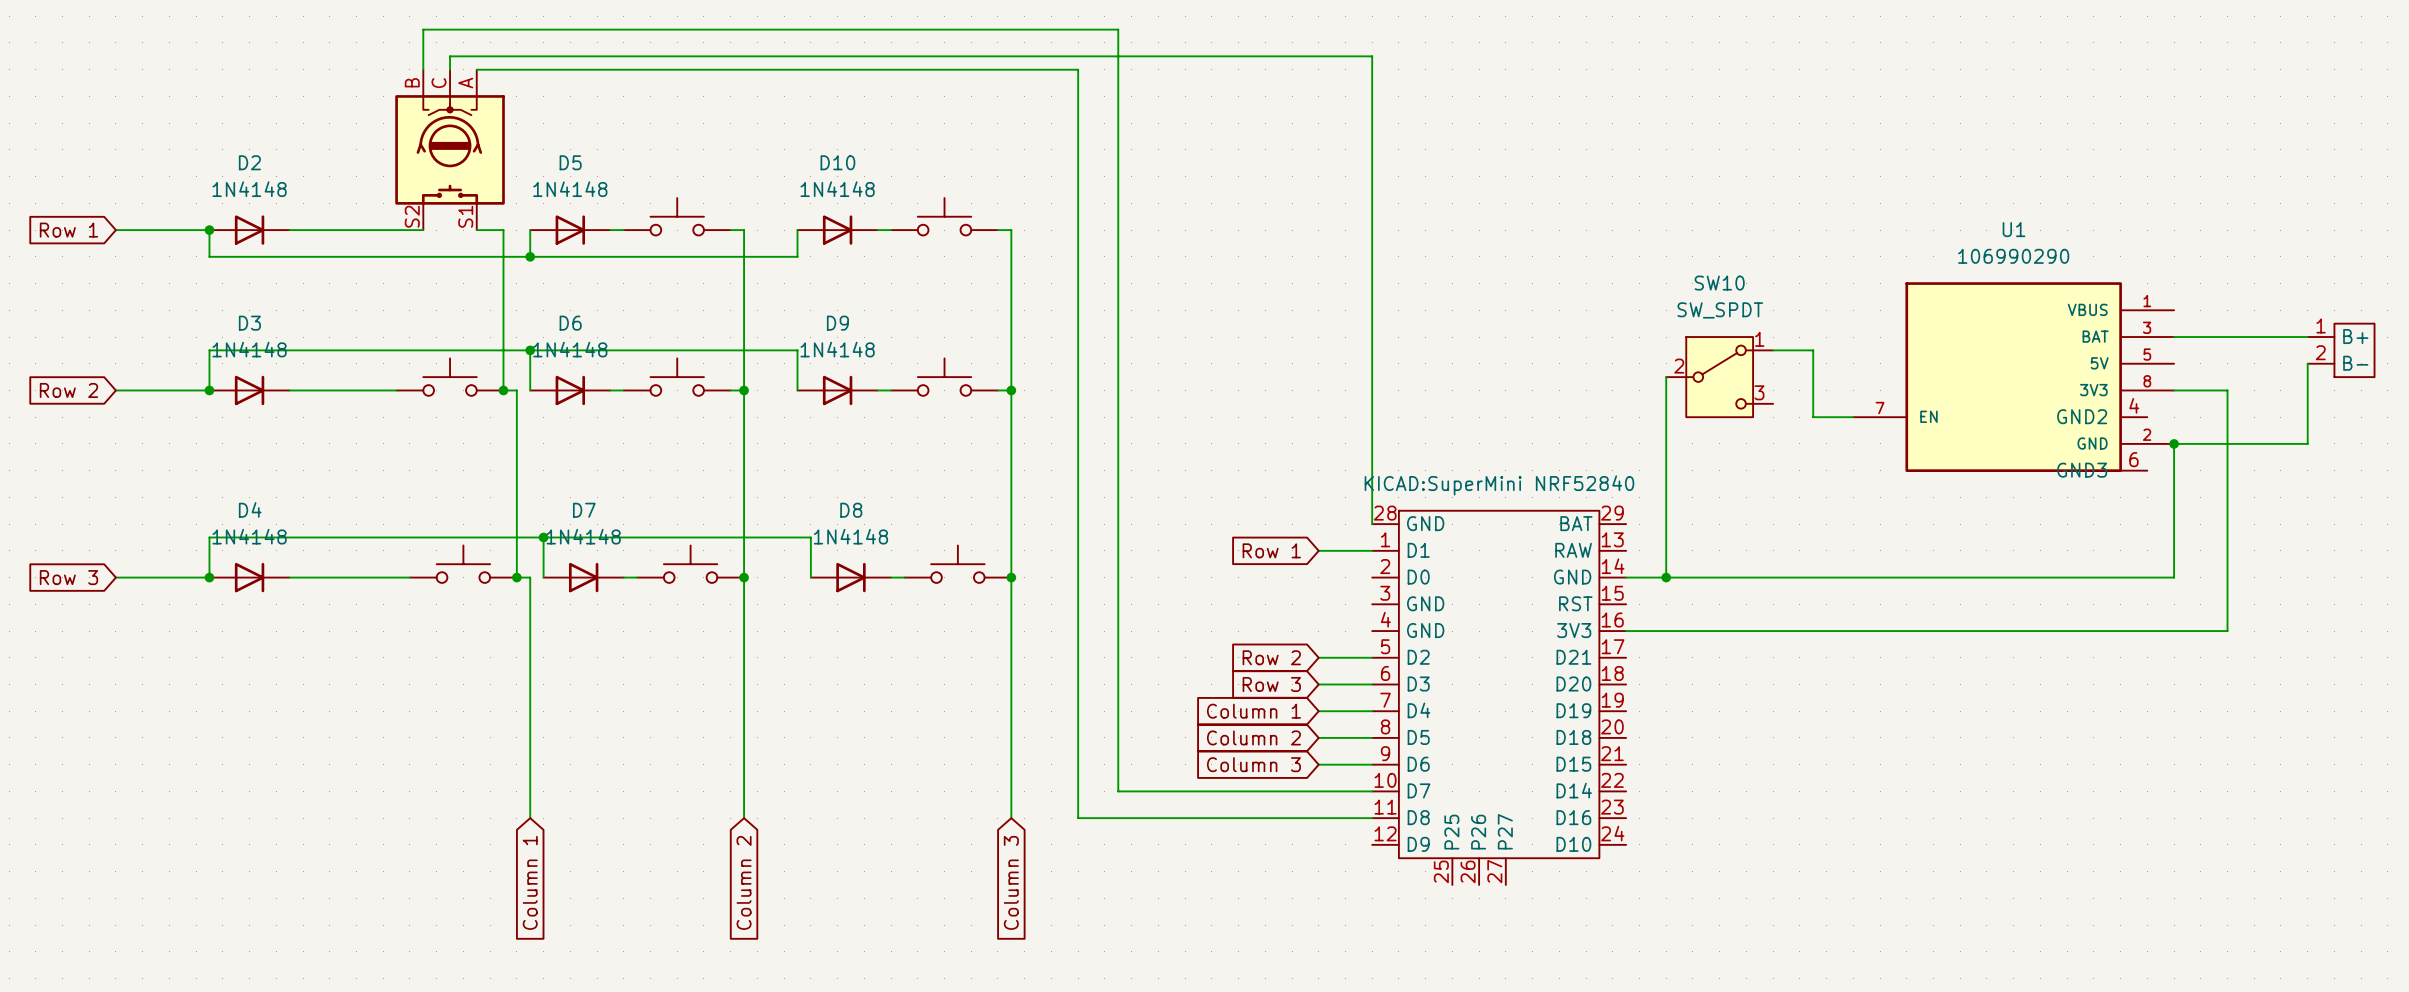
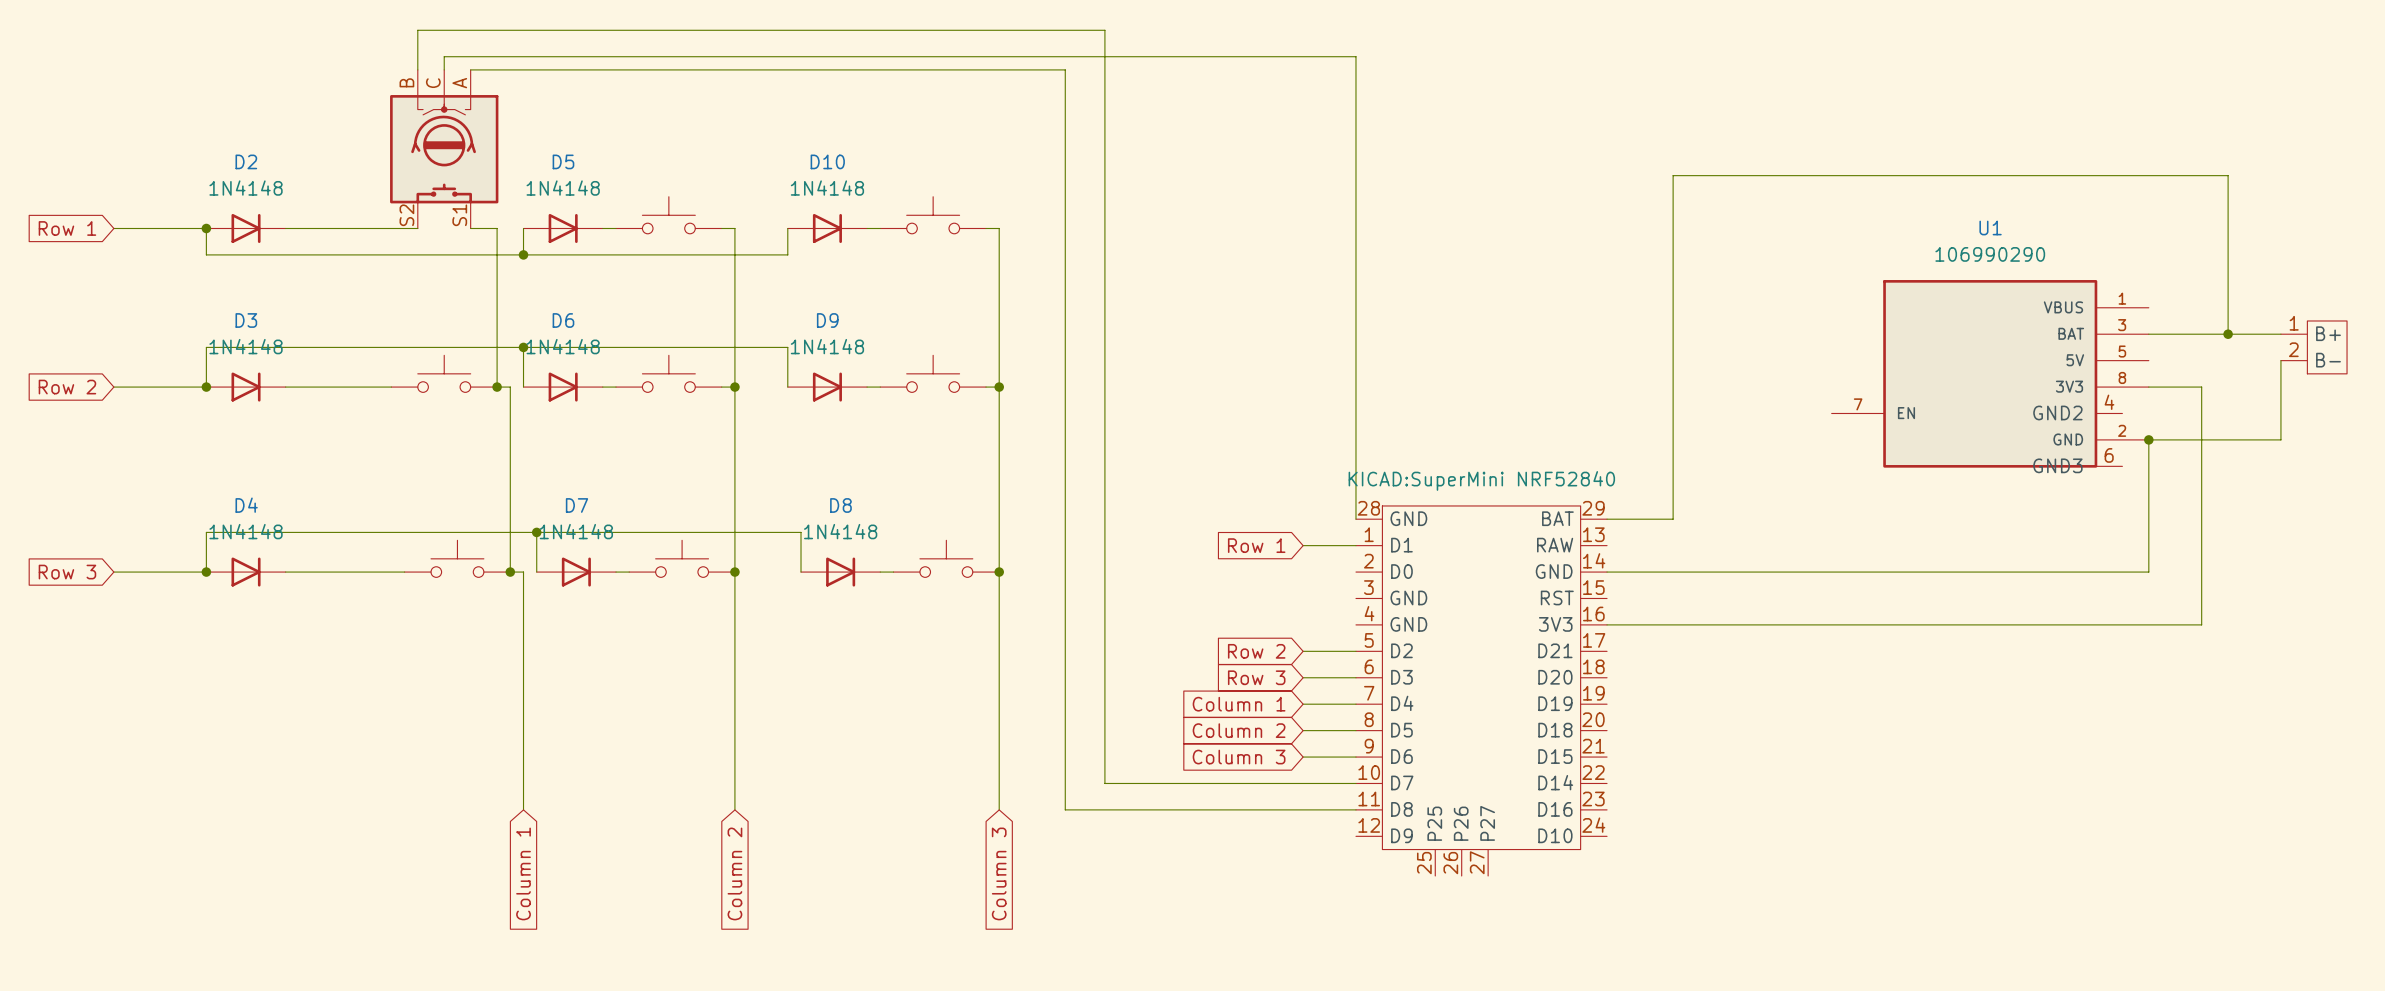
wire: none -> (2228, 334) (2228, 175) (1673, 175) (1673, 519) (1607, 519)
junction: none -> (2228, 334)
wire: (1773, 350) (1813, 350) (1813, 417) (1853, 417) -> none
wire: (1666, 377) (1666, 577) -> none
SW10: SW_SPDT (1719, 377) -> none
junction: (1666, 577) -> none

